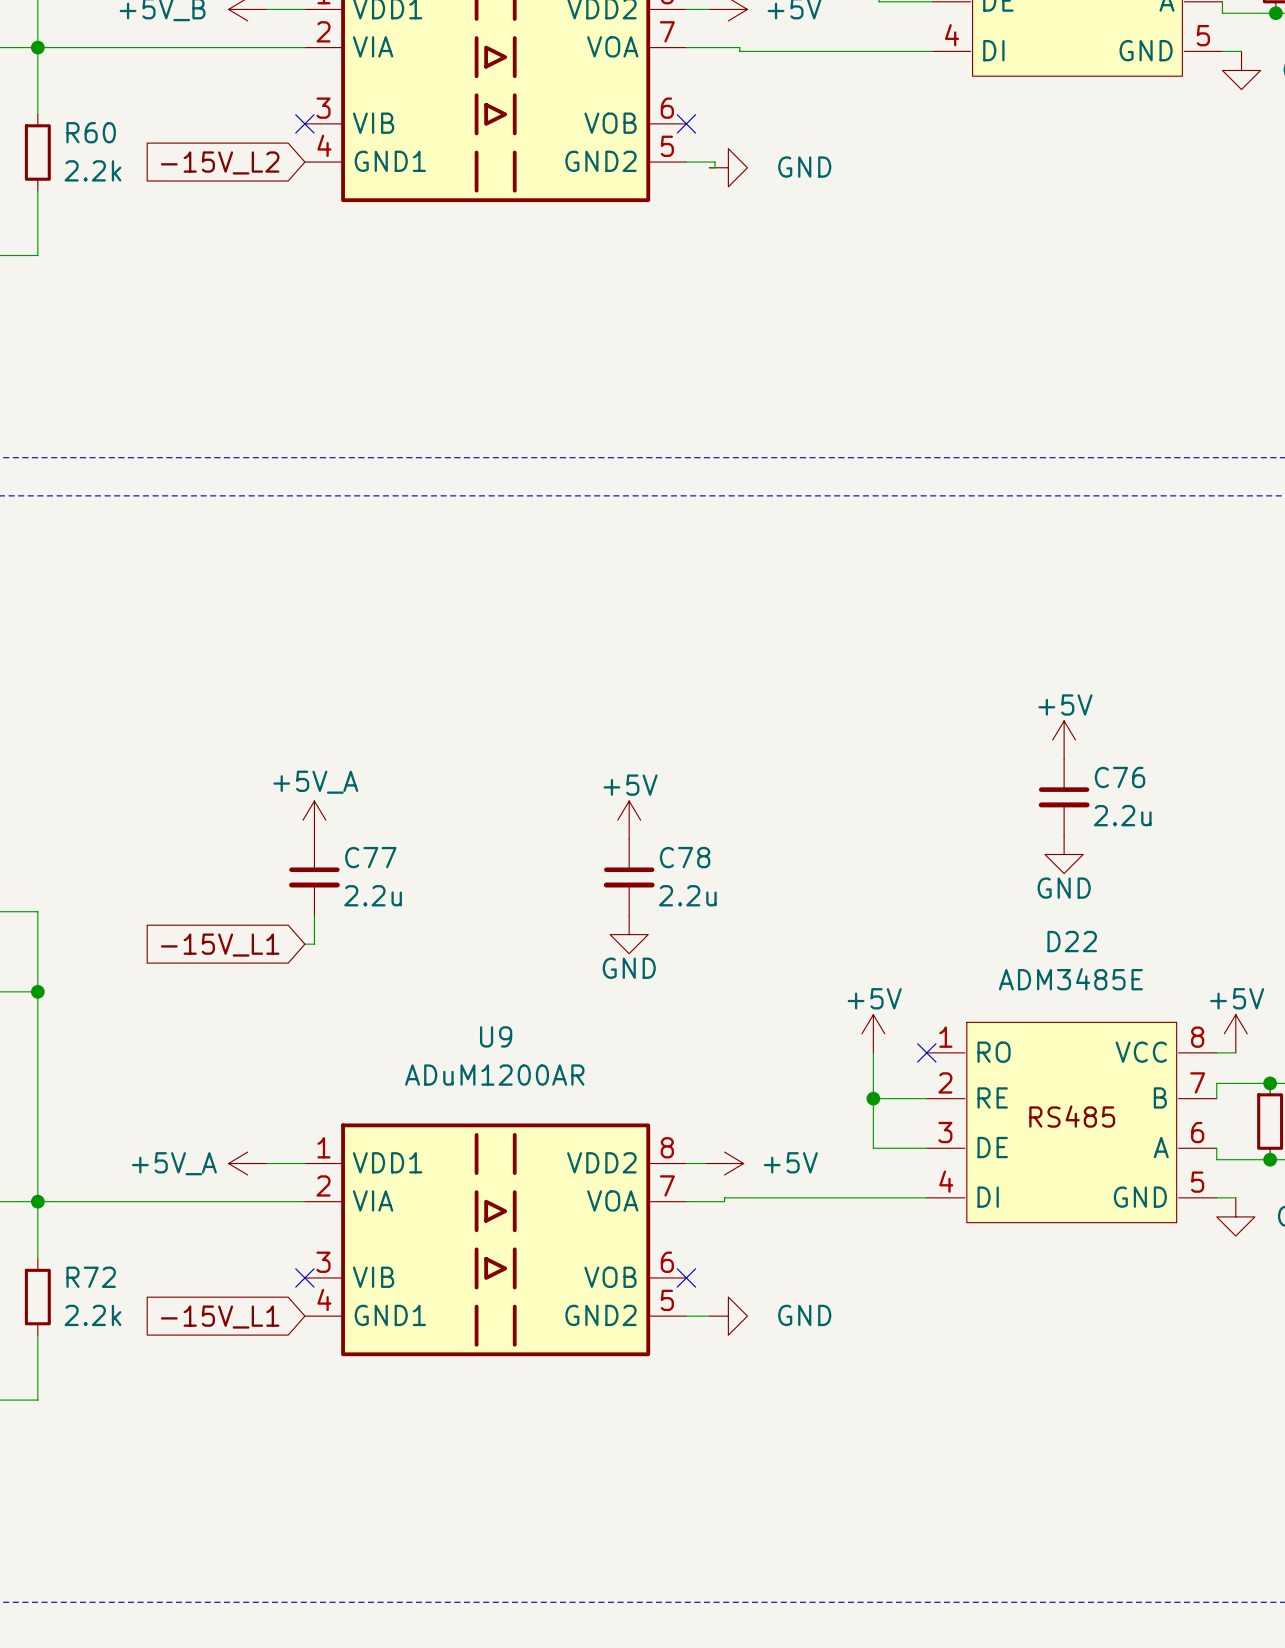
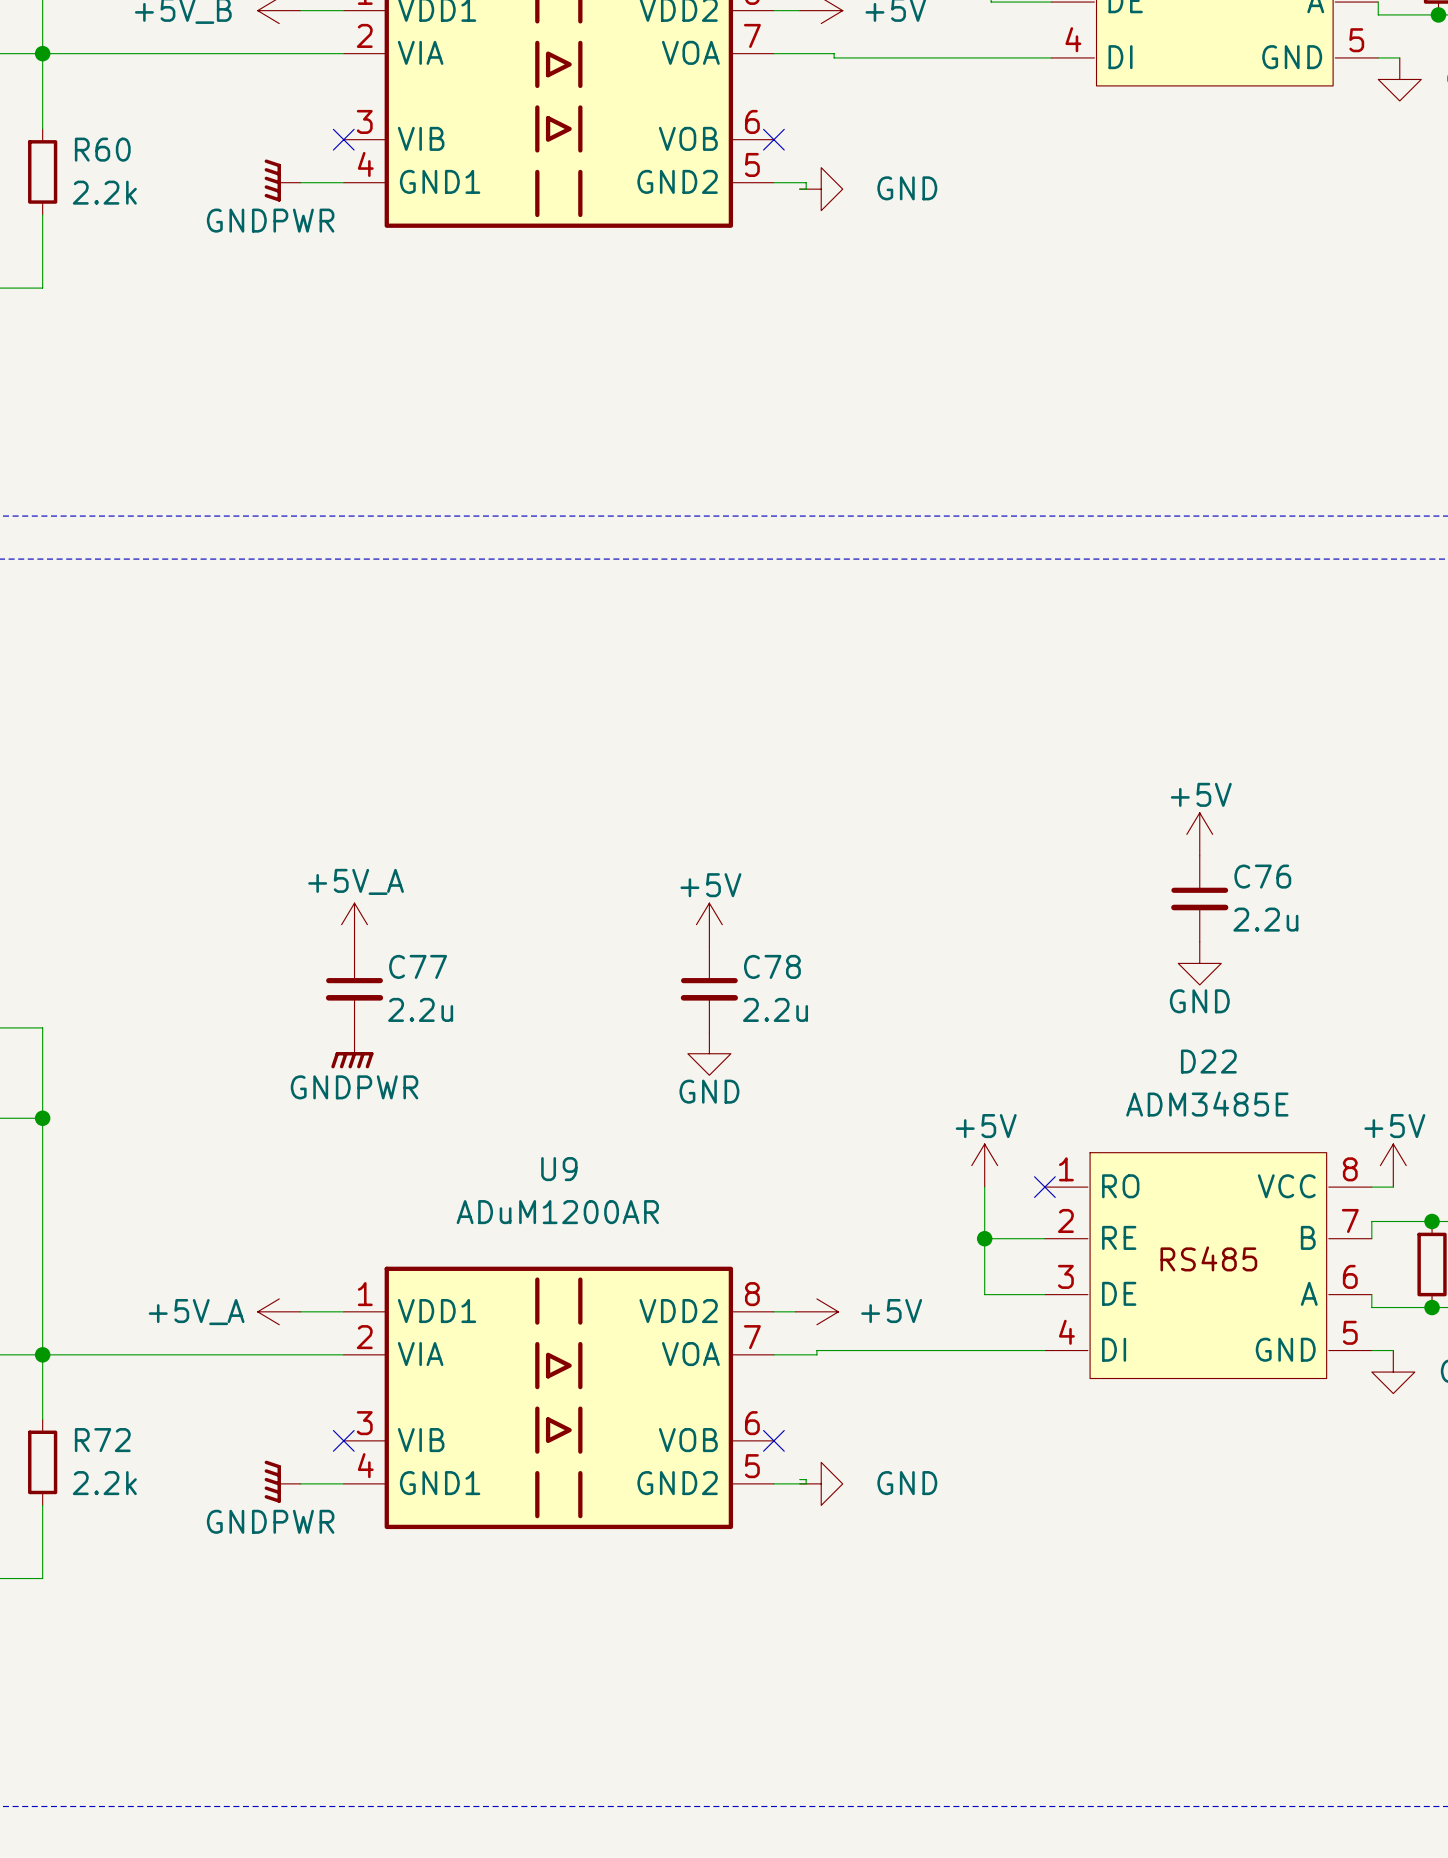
power symbol: none -> GNDPWR (282, 180)
global label: -15V_L2 (220, 162) -> none
wire: none -> (300, 182) (343, 182)
power symbol: none -> GNDPWR (352, 1050)
global label: -15V_L1 (220, 945) -> none
wire: none -> (799, 1479) (806, 1479) (806, 1483) (799, 1483)
power symbol: none -> GNDPWR (282, 1481)
wire: none -> (300, 1483) (343, 1483)
global label: -15V_L1 (220, 1317) -> none

